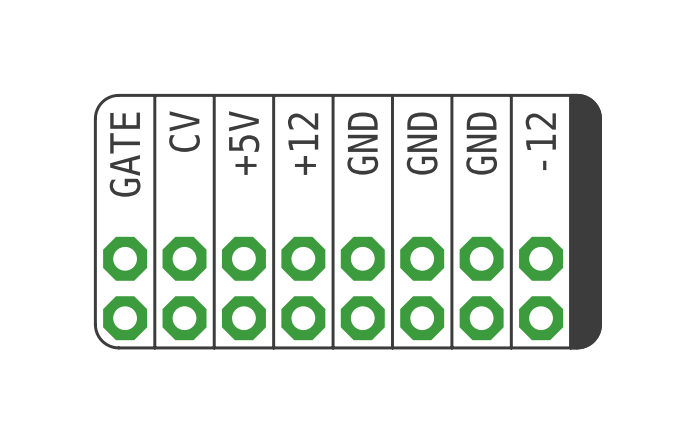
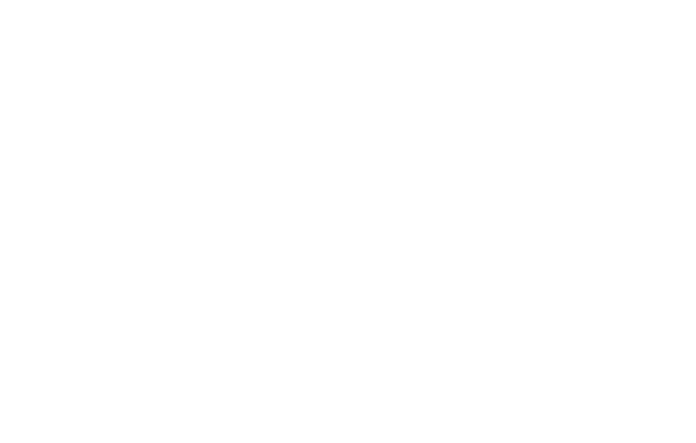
part: (347, 221) -> none

